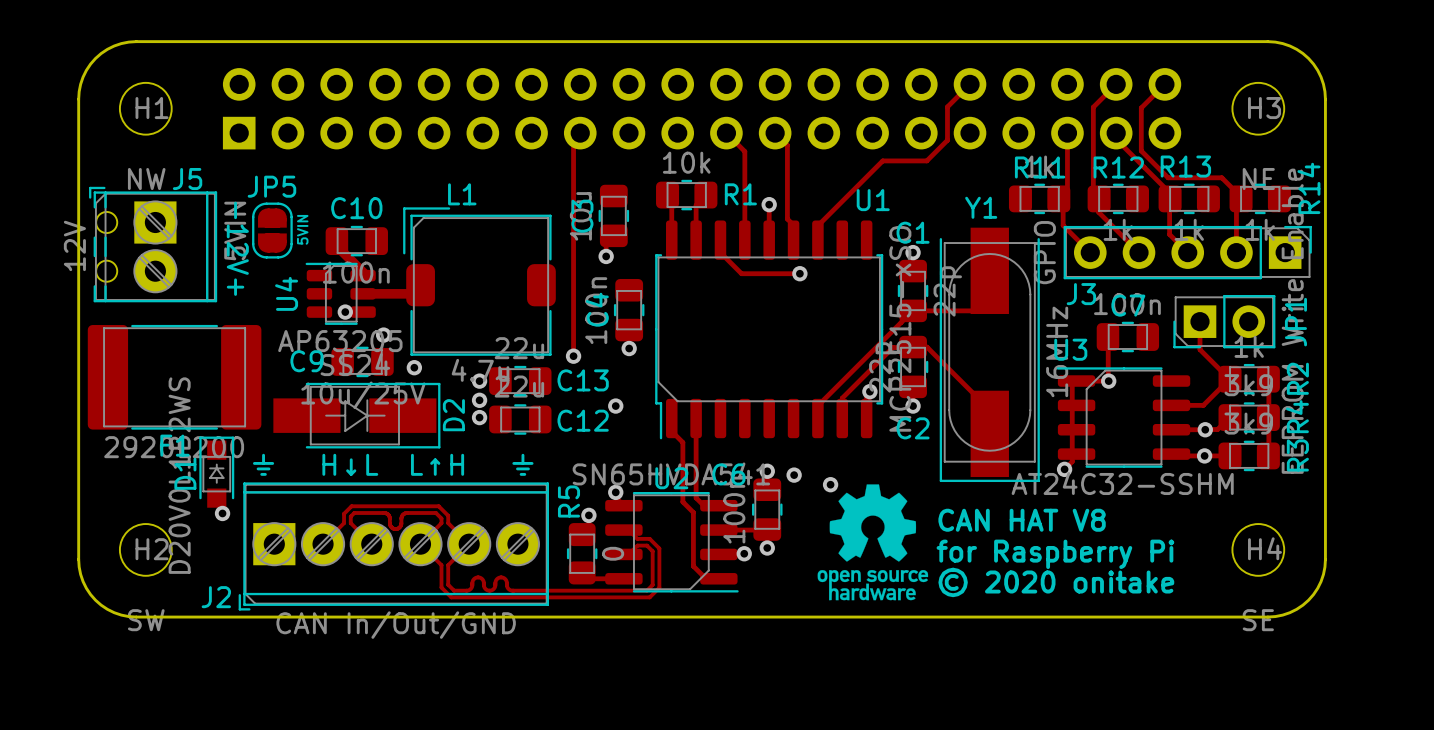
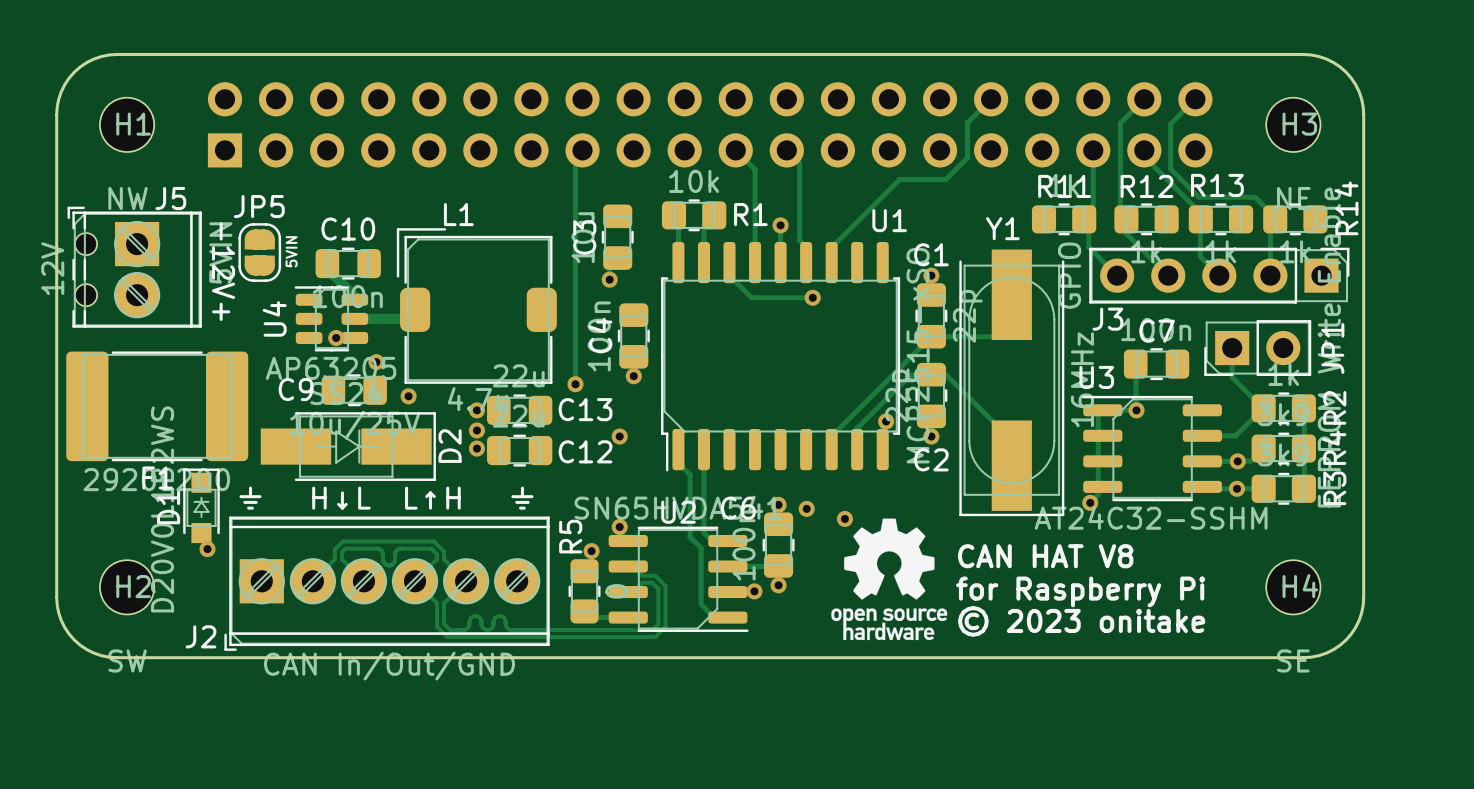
text: © 2020 onitake (1056, 582) -> © 2023 onitake (1081, 621)

